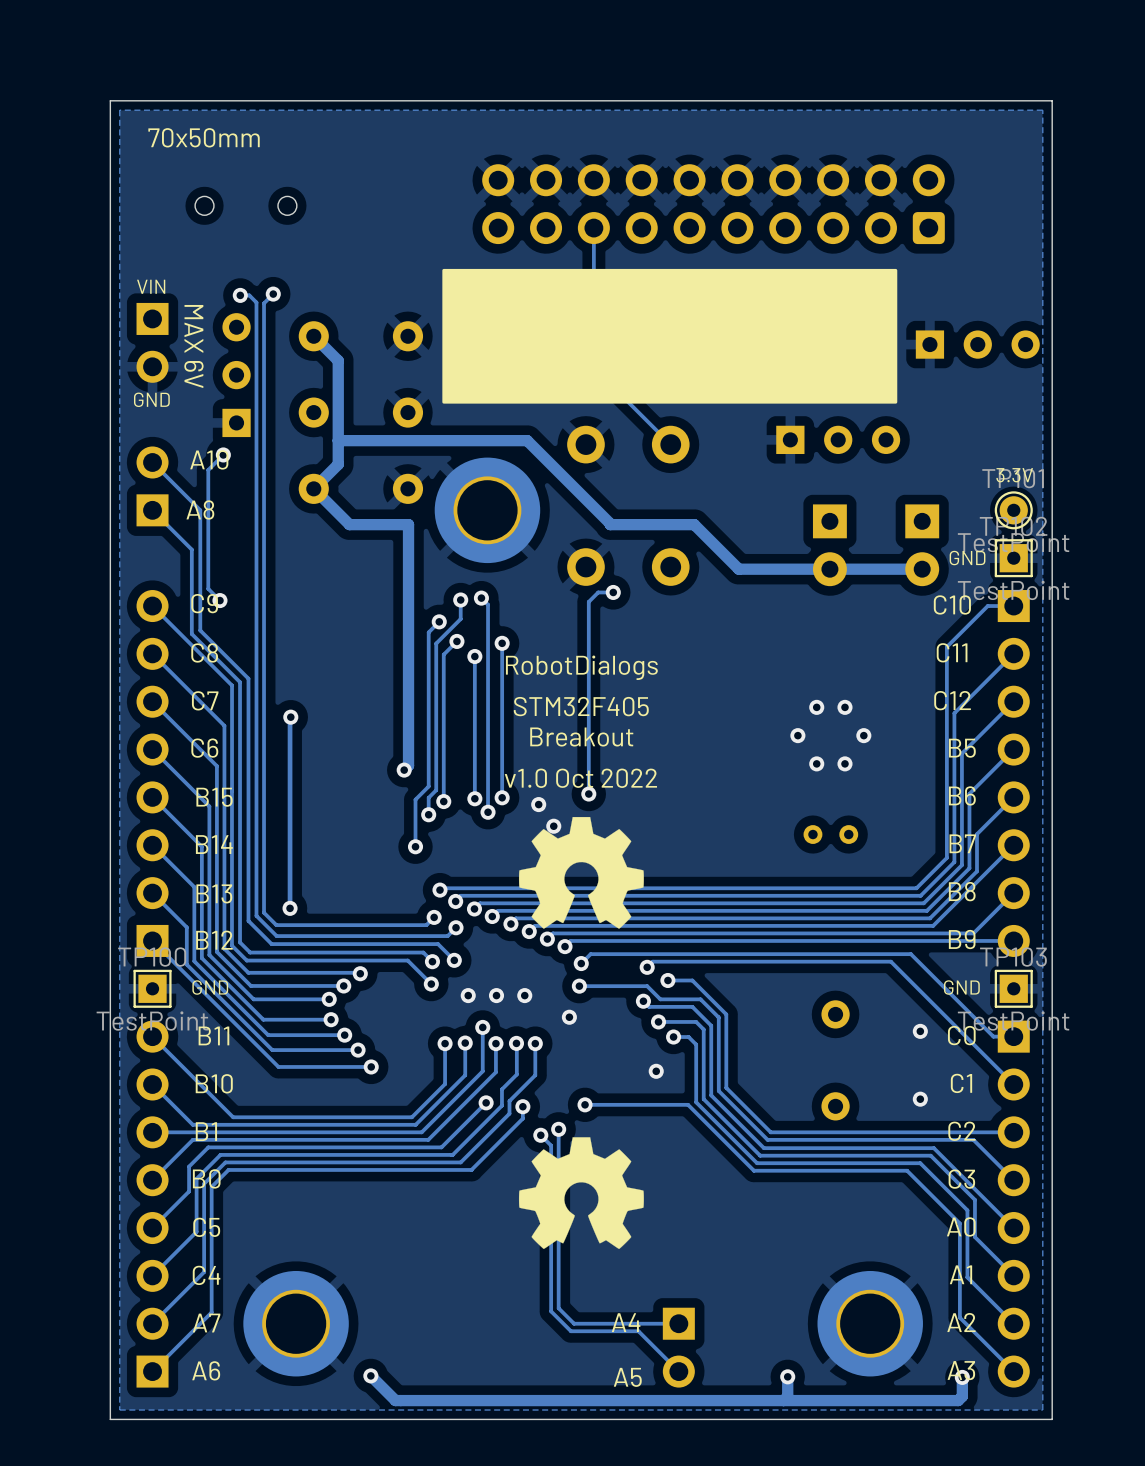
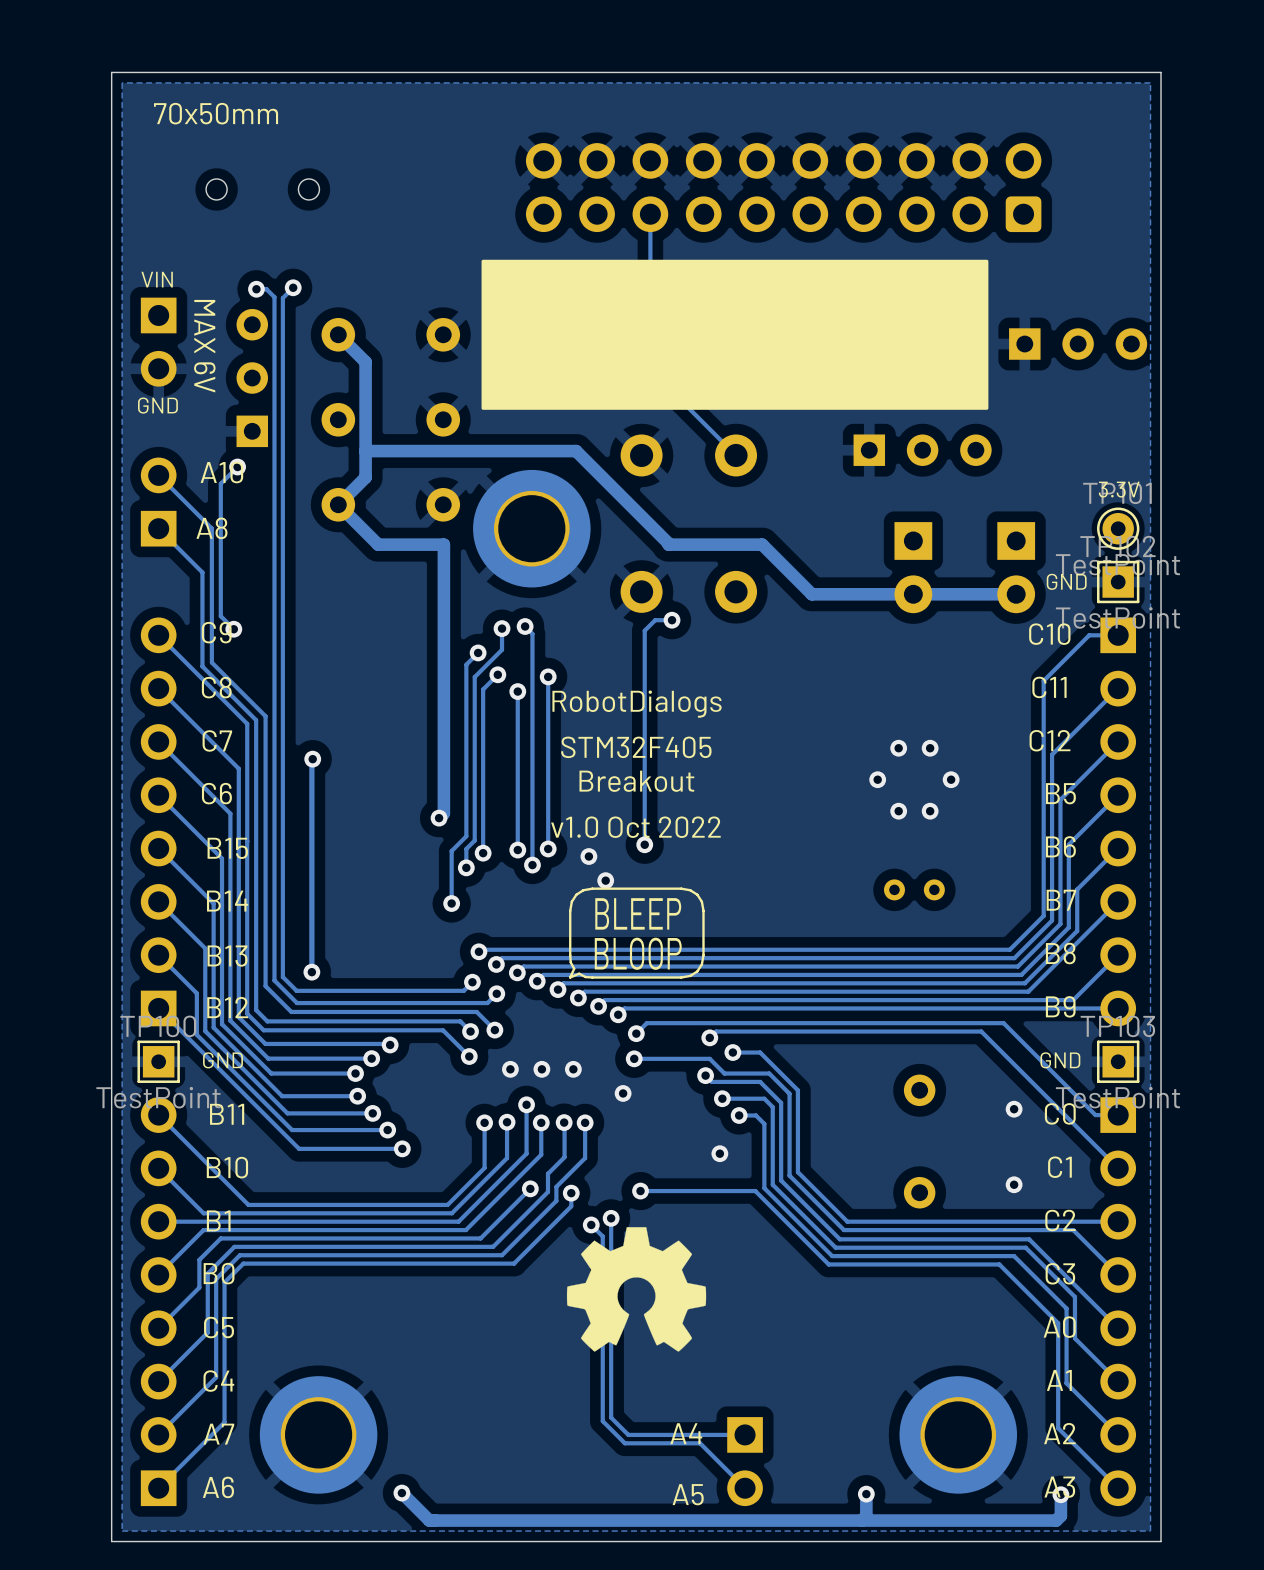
drawing shape: [518, 816, 644, 929] -> [568, 887, 705, 979]

